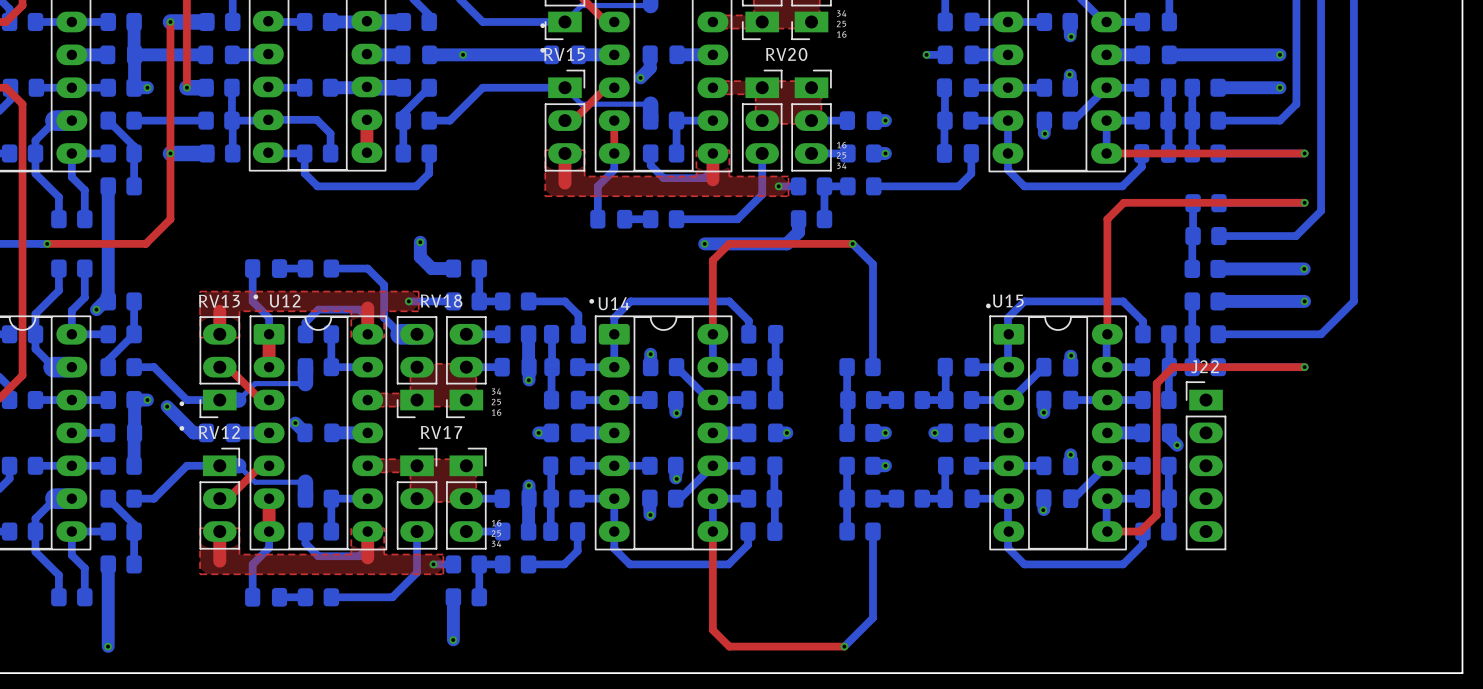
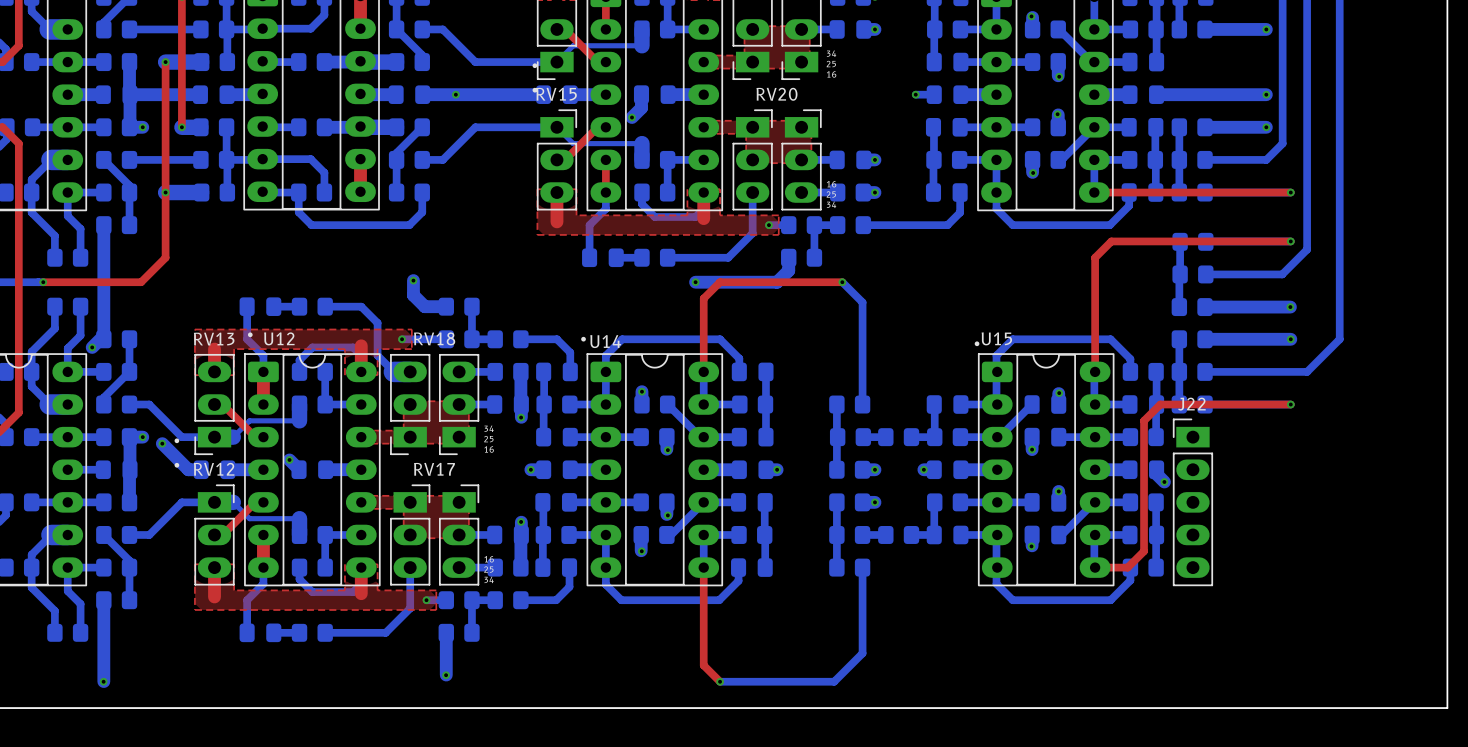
bottom track: none -> (720, 681) (834, 681)
top track: (729, 646) (844, 646) -> none
via: none -> (720, 681)
via: (844, 646) -> none

